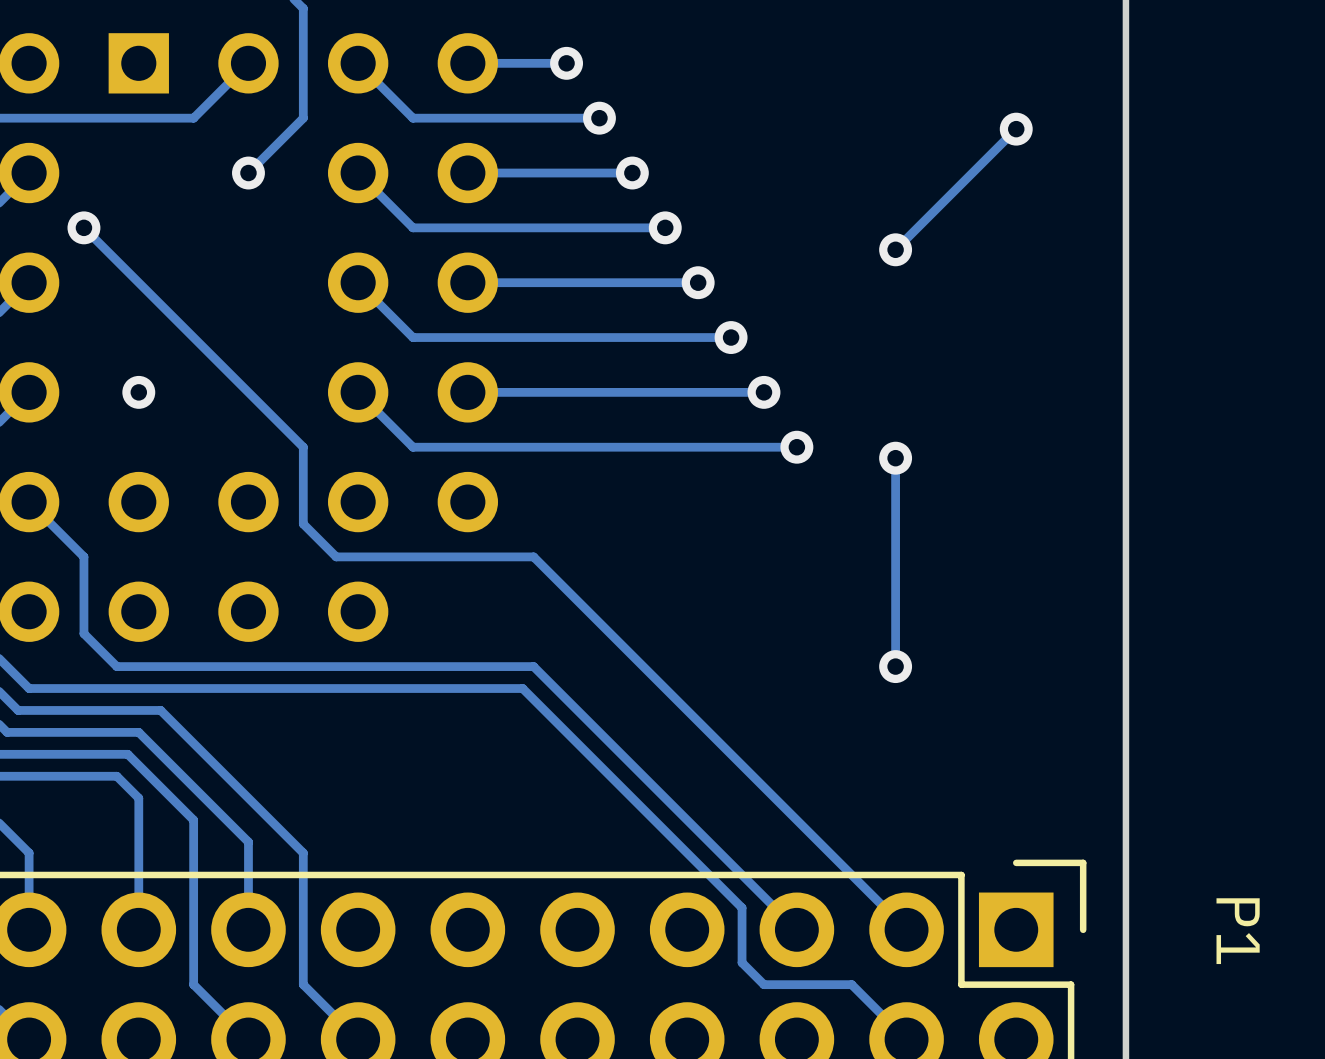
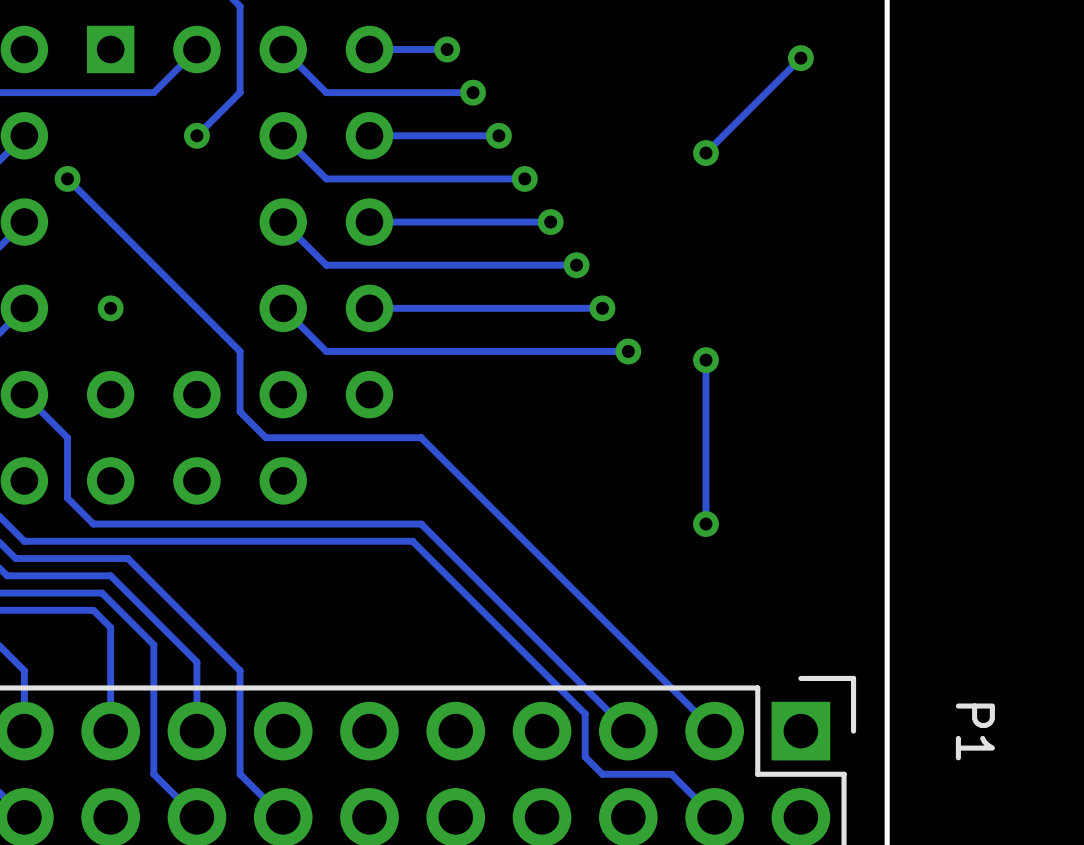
track: (1016, 129) (895, 249) -> (800, 58) (705, 153)
via position: (1016, 129) -> (800, 58)
via position: (895, 249) -> (705, 153)

